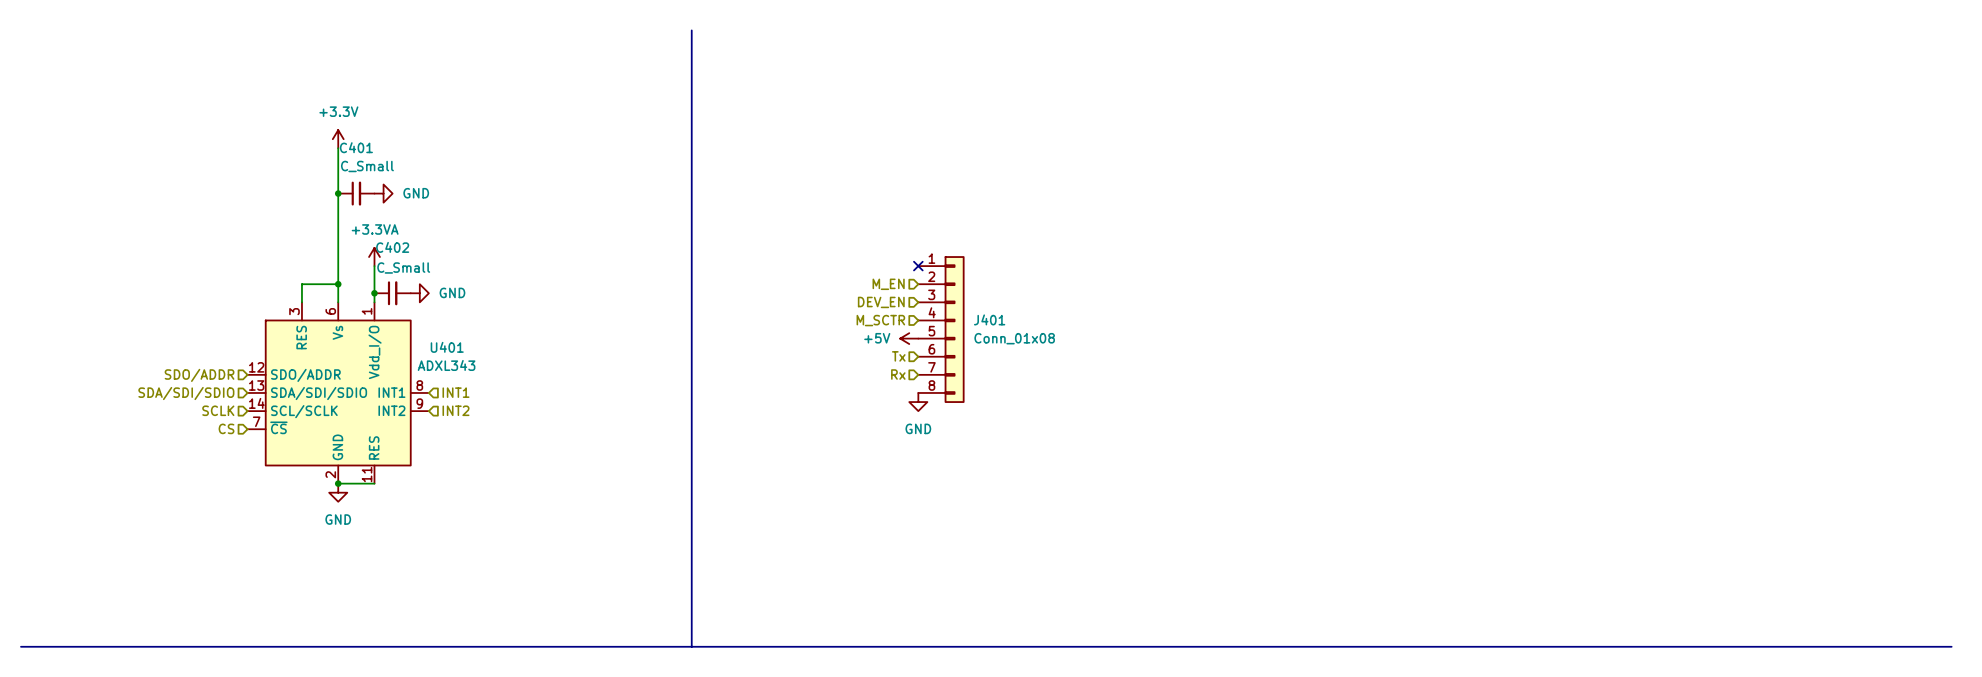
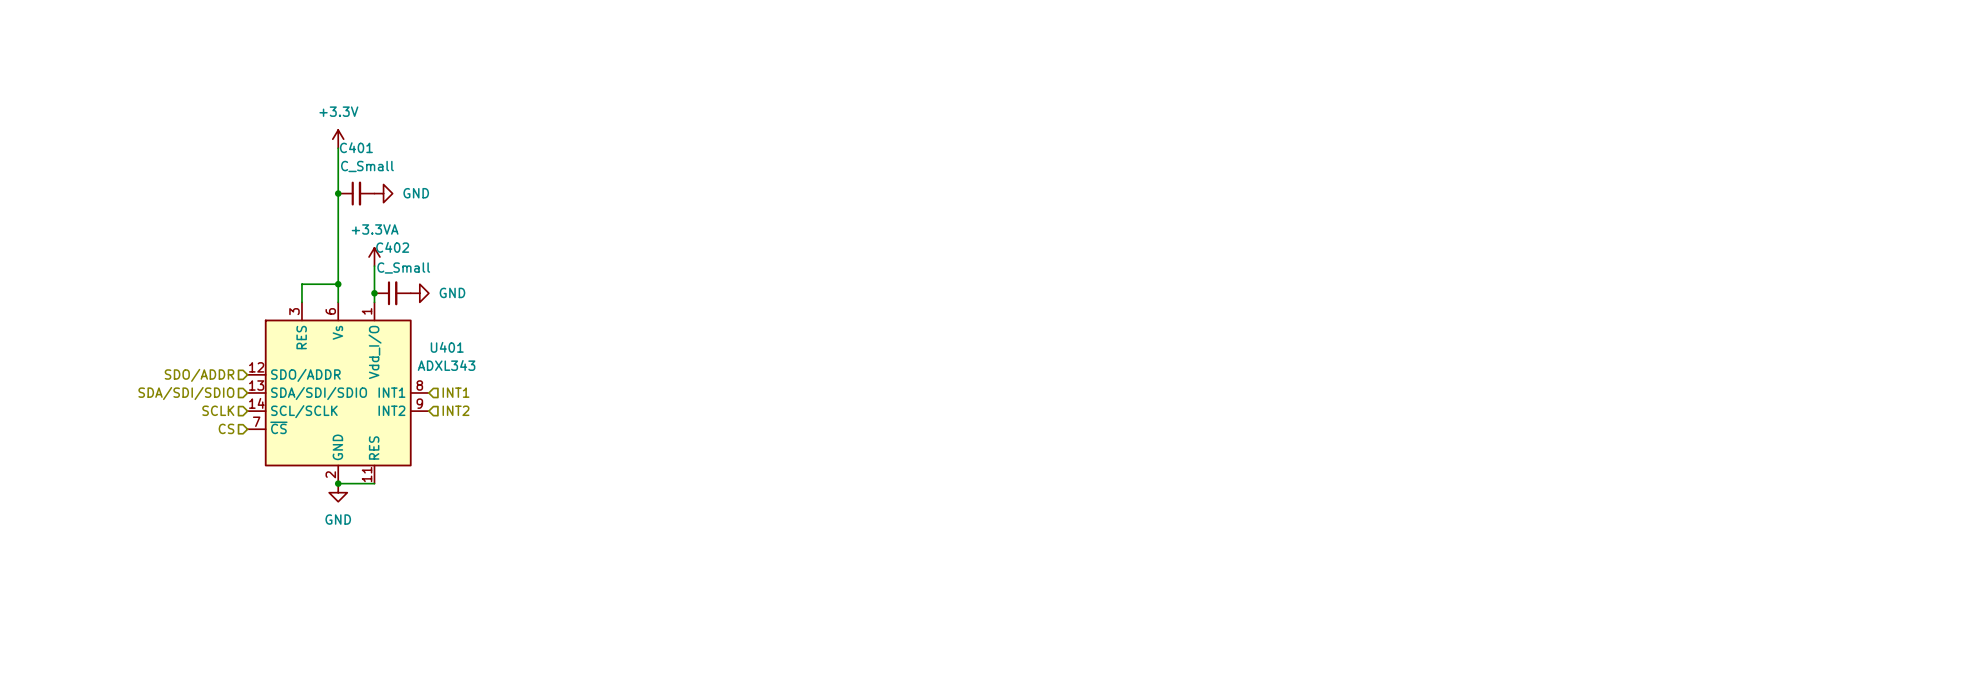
line: (691, 30) (691, 646) -> none
no-connect mark: (918, 266) -> none
hierarchical label: M_EN (888, 284) -> none
hierarchical label: DEV_EN (881, 302) -> none
hierarchical label: M_SCTR (880, 320) -> none
J401: Conn_01x08 (941, 329) -> none
power symbol: +5V (909, 338) -> none
hierarchical label: Tx (898, 356) -> none
hierarchical label: Rx (898, 374) -> none
power symbol: GND (918, 402) -> none
line: (20, 646) (1951, 646) -> none

